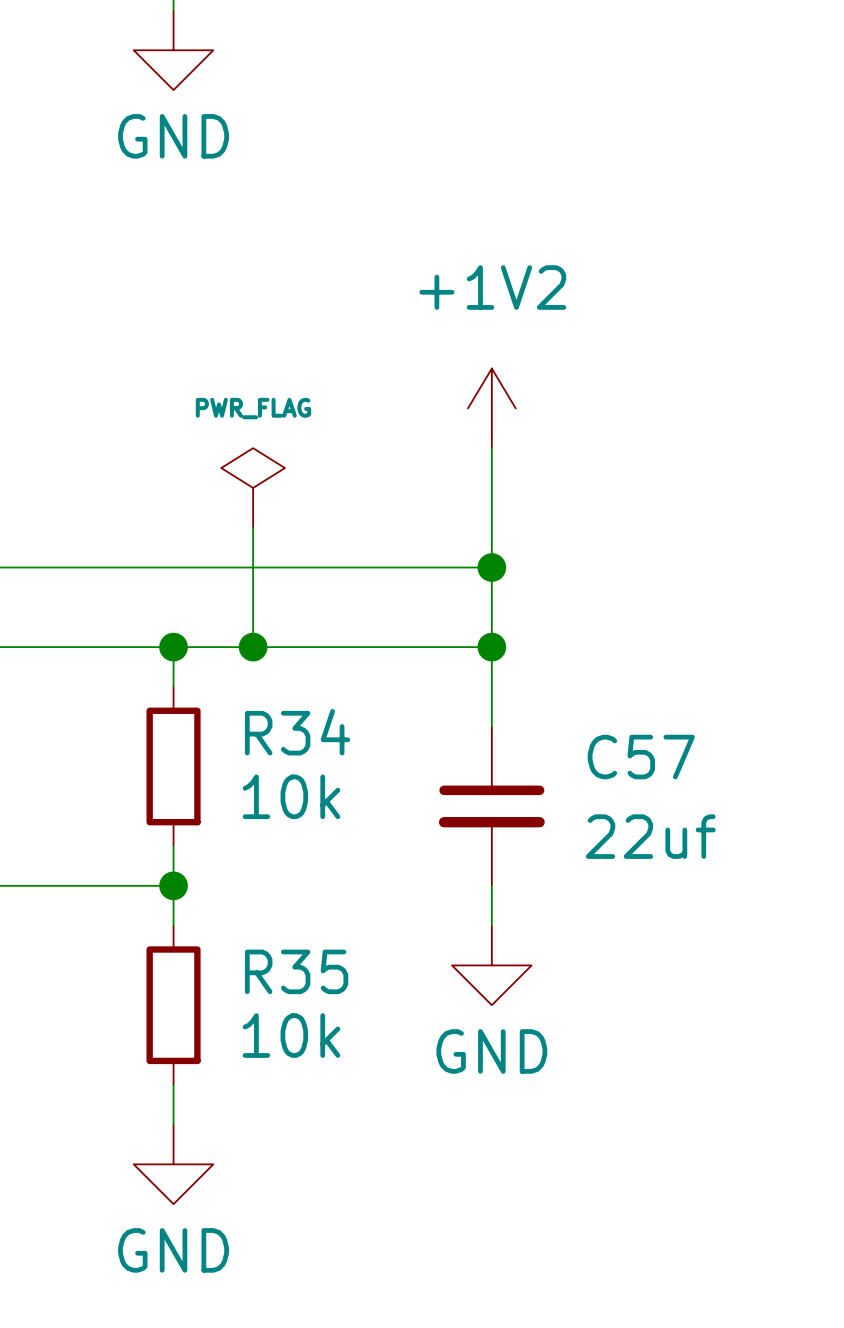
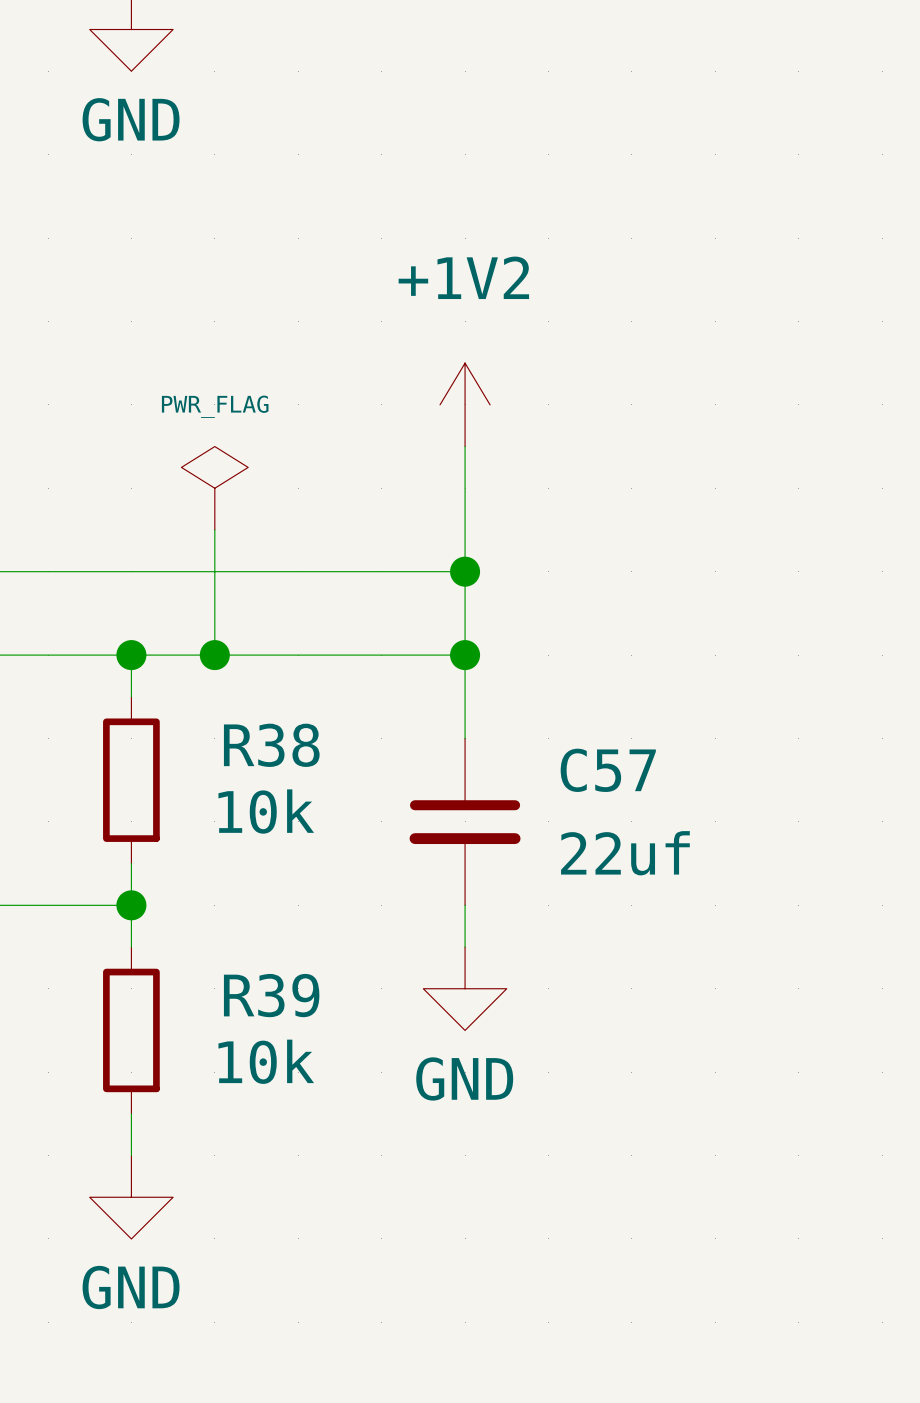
R34 name: R34 (297, 732) -> R38 (271, 745)
R35 name: R35 (296, 971) -> R39 (271, 995)

